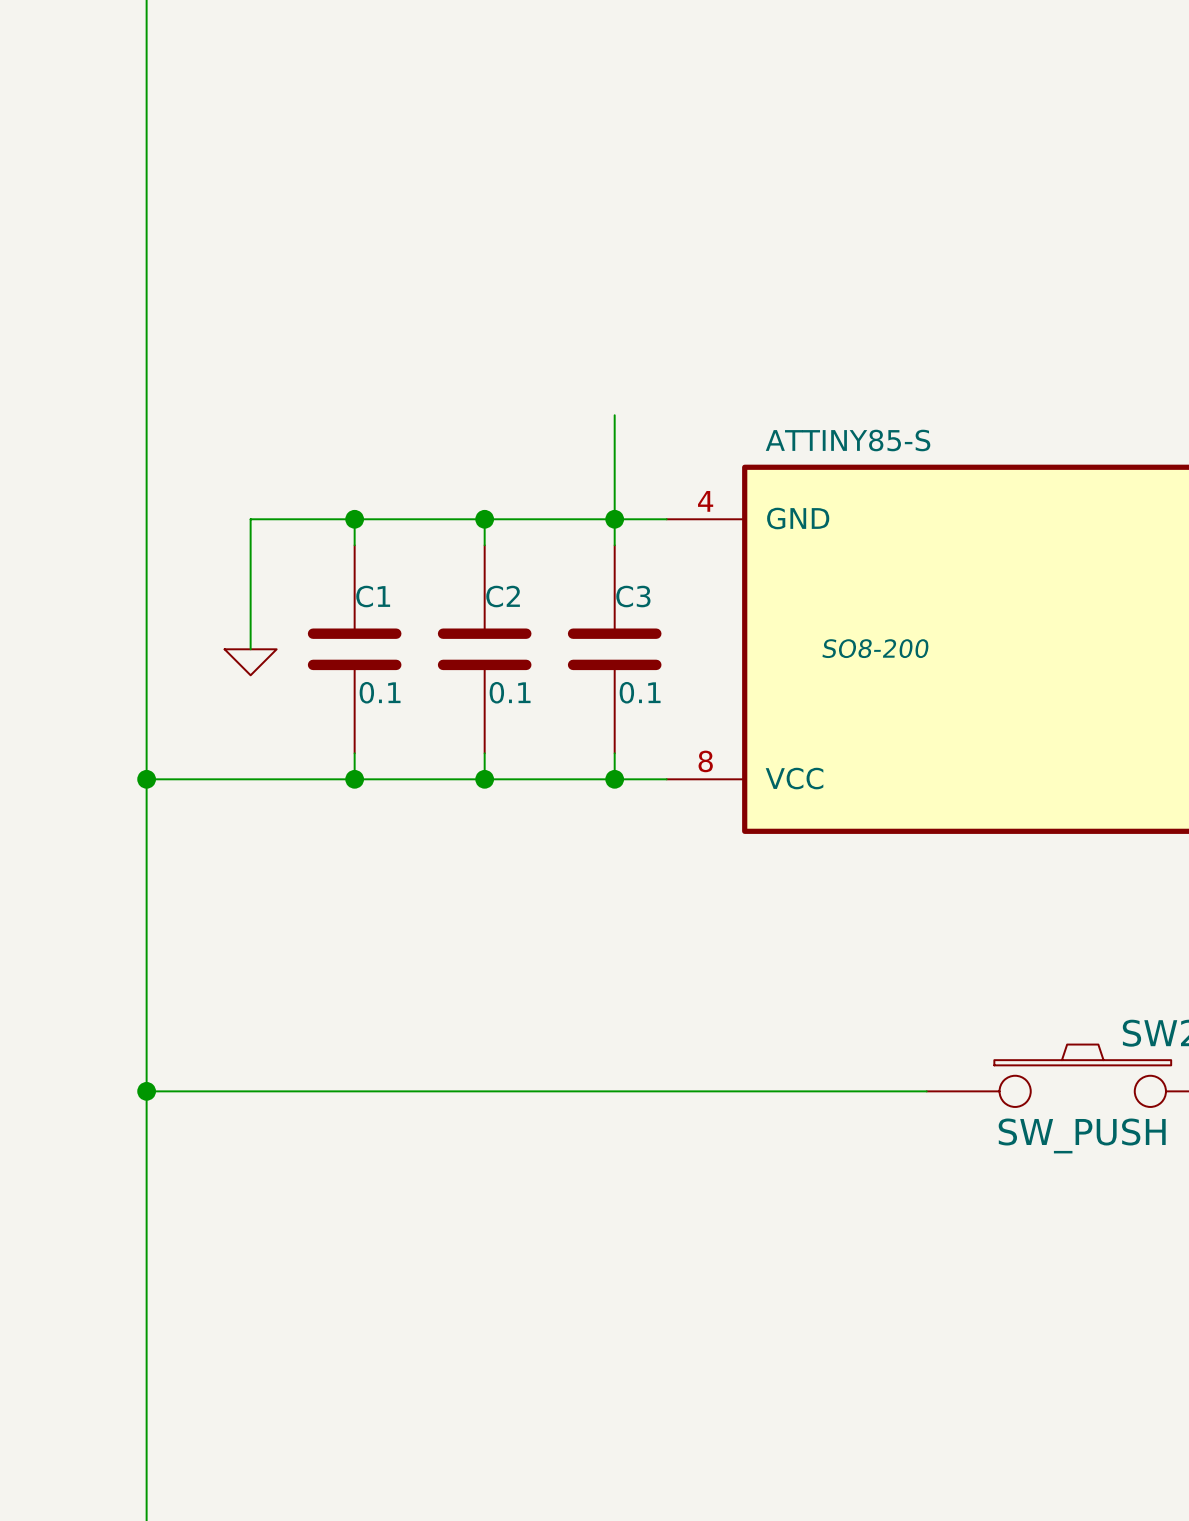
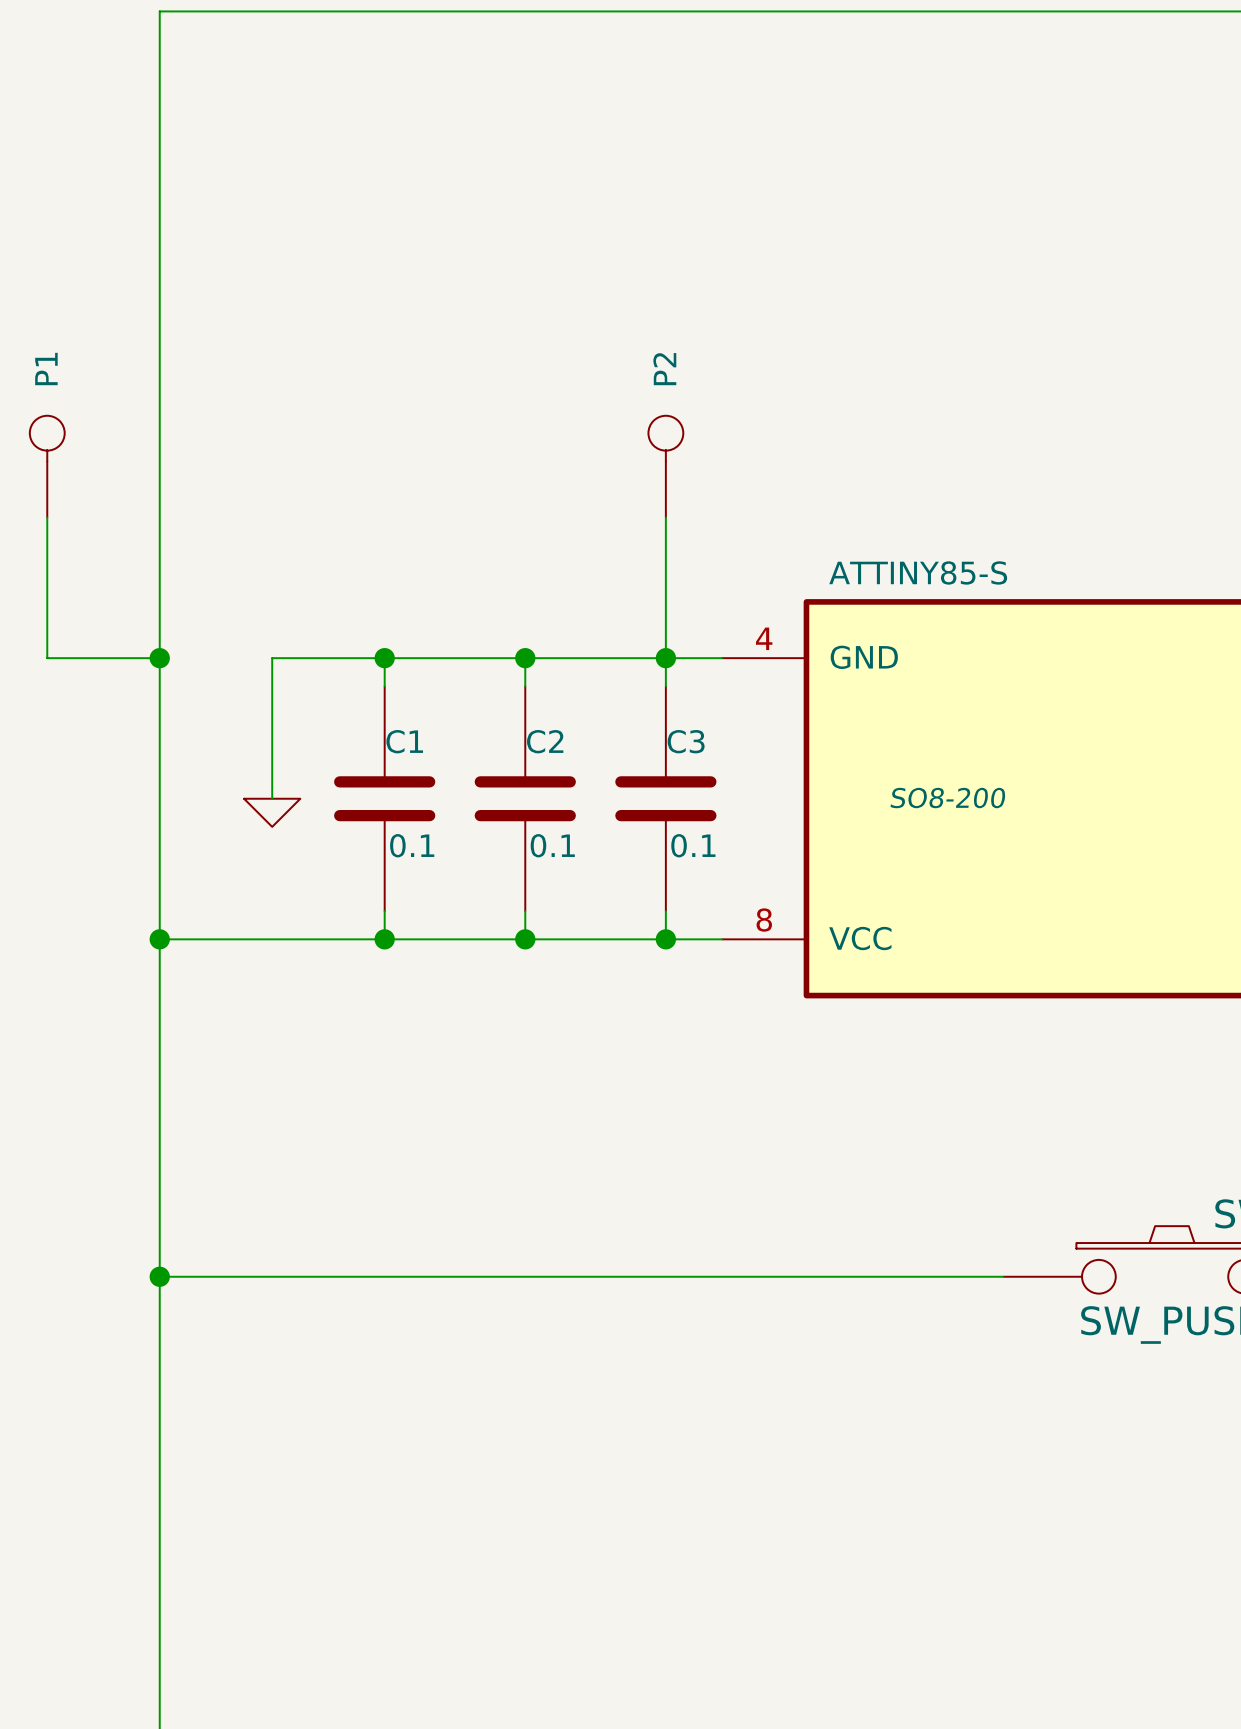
P1: none -> (47, 466)
P2: none -> (665, 466)
wire: none -> (47, 517) (47, 658) (159, 658)
wire: none -> (665, 517) (665, 545)
junction: none -> (159, 658)

